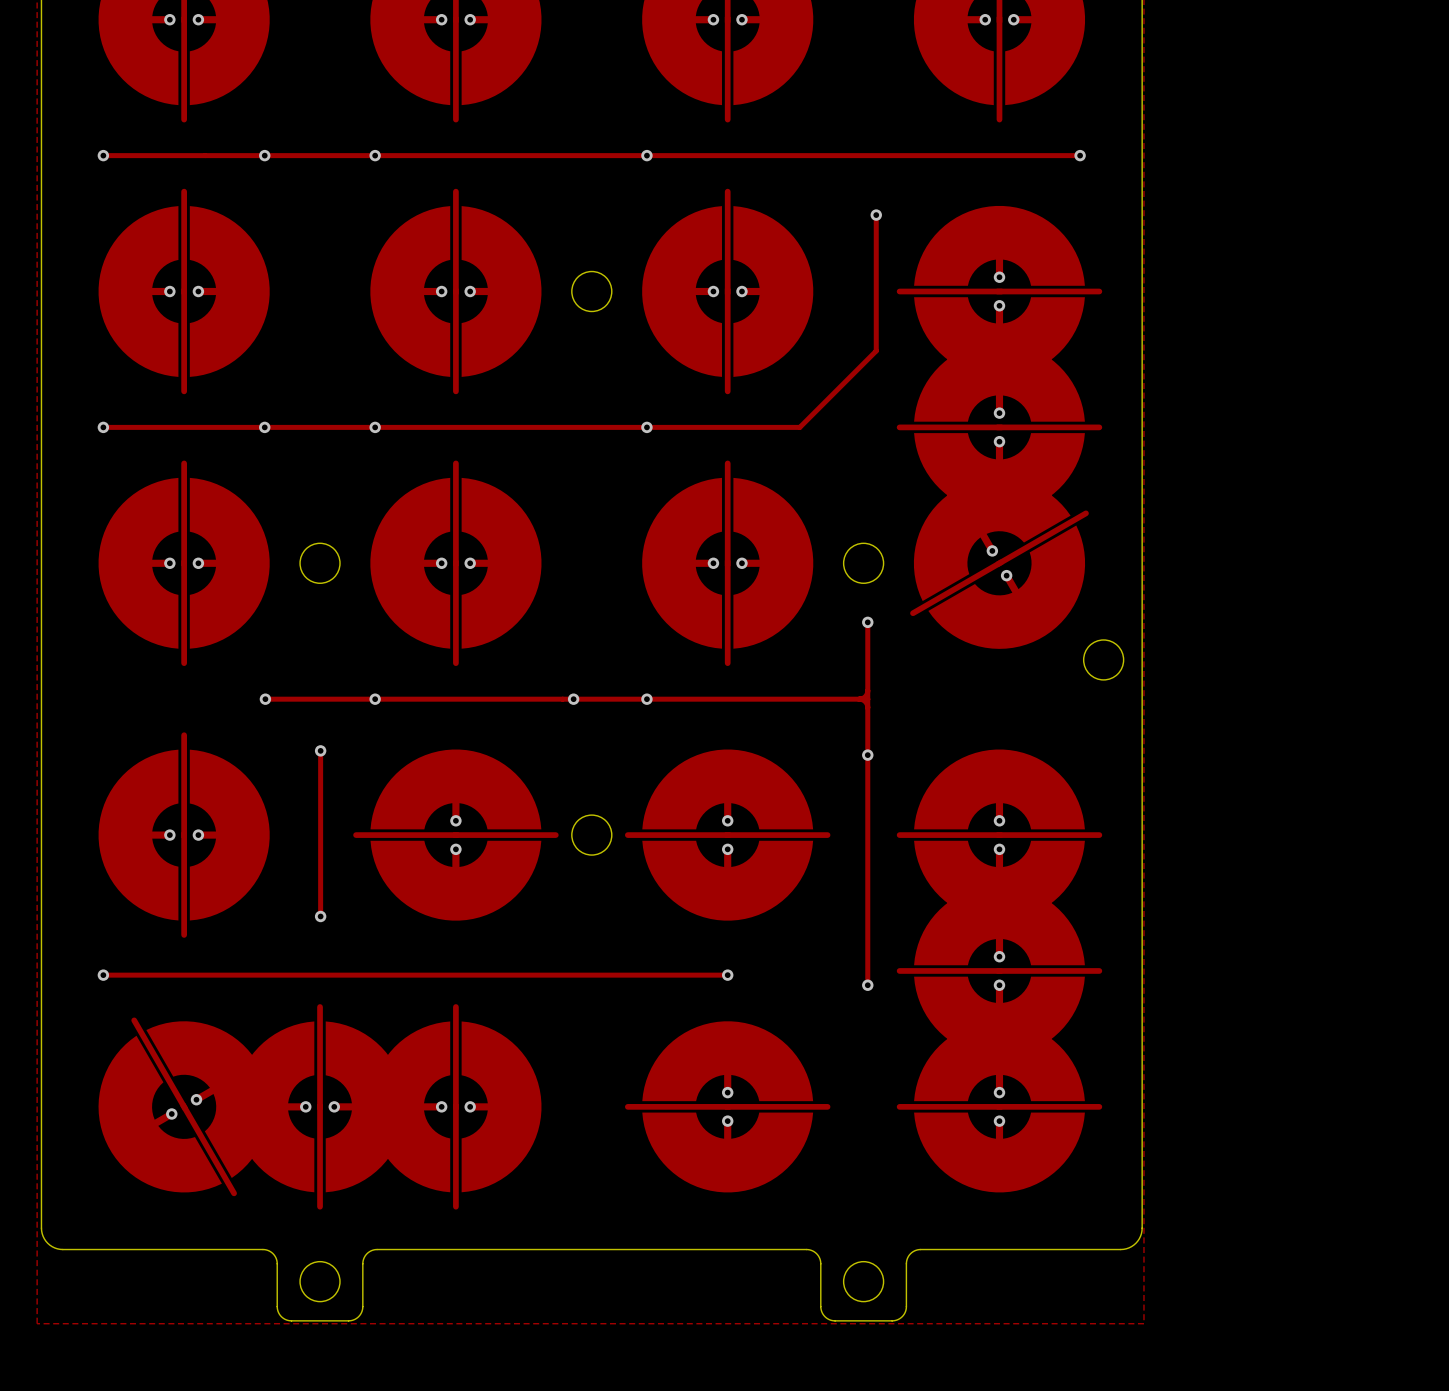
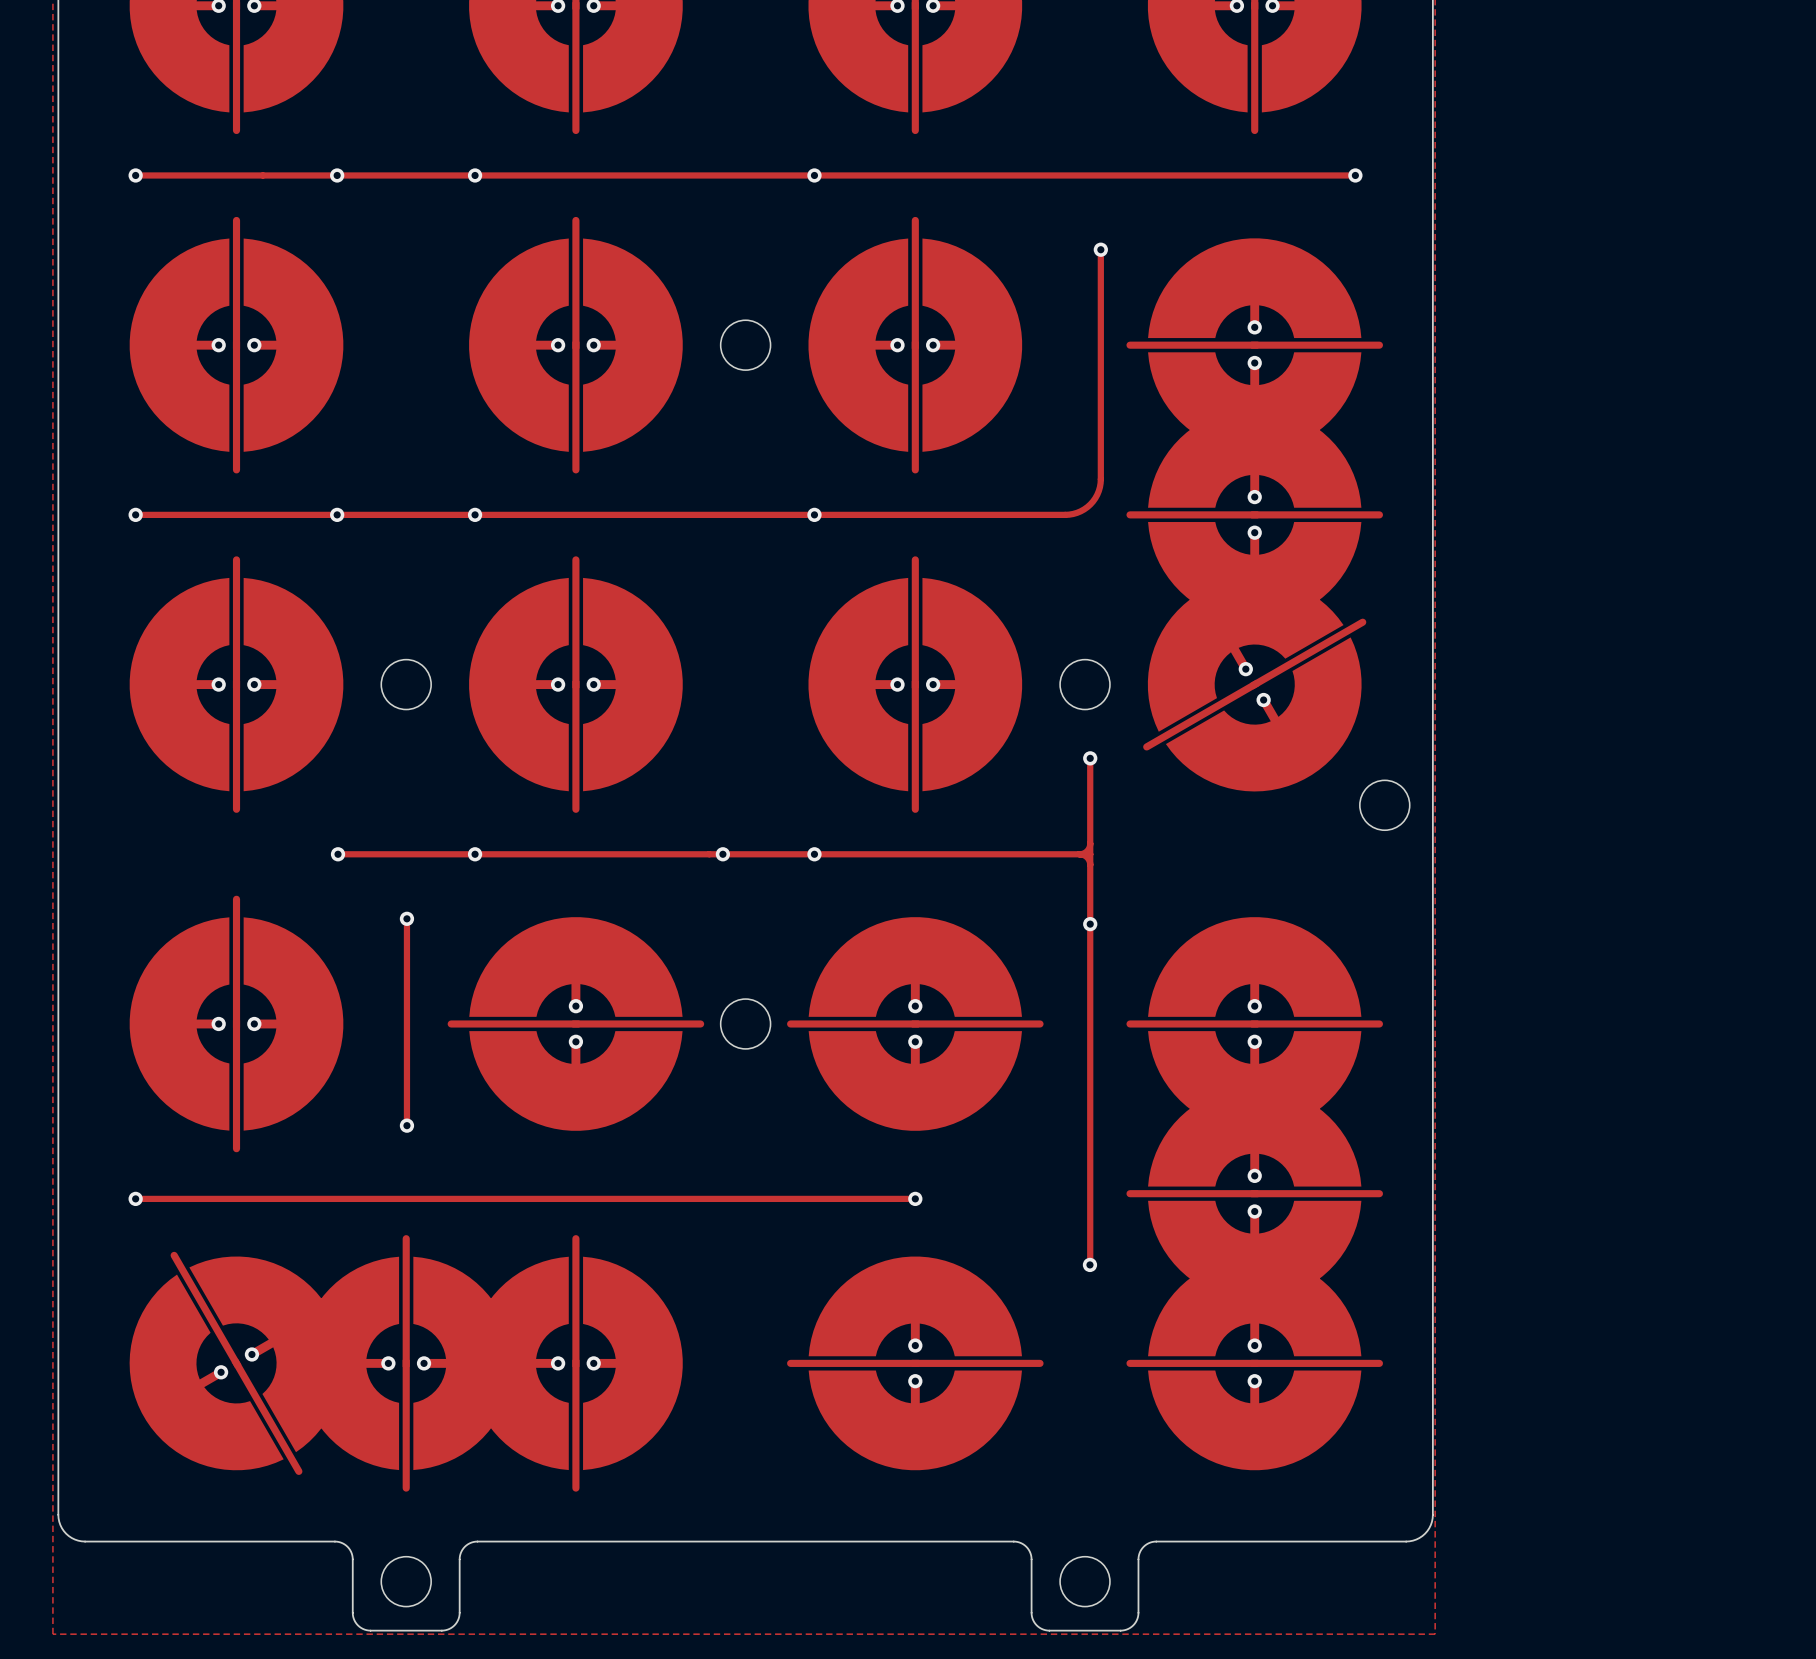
track: (876, 350) (799, 427) -> (1100, 419) (1100, 483) (1097, 494) (1090, 504) (1080, 511) (1069, 514) (1005, 514)
track: none -> (1090, 1211) (1089, 1264)
via position: (867, 985) -> (1089, 1264)

